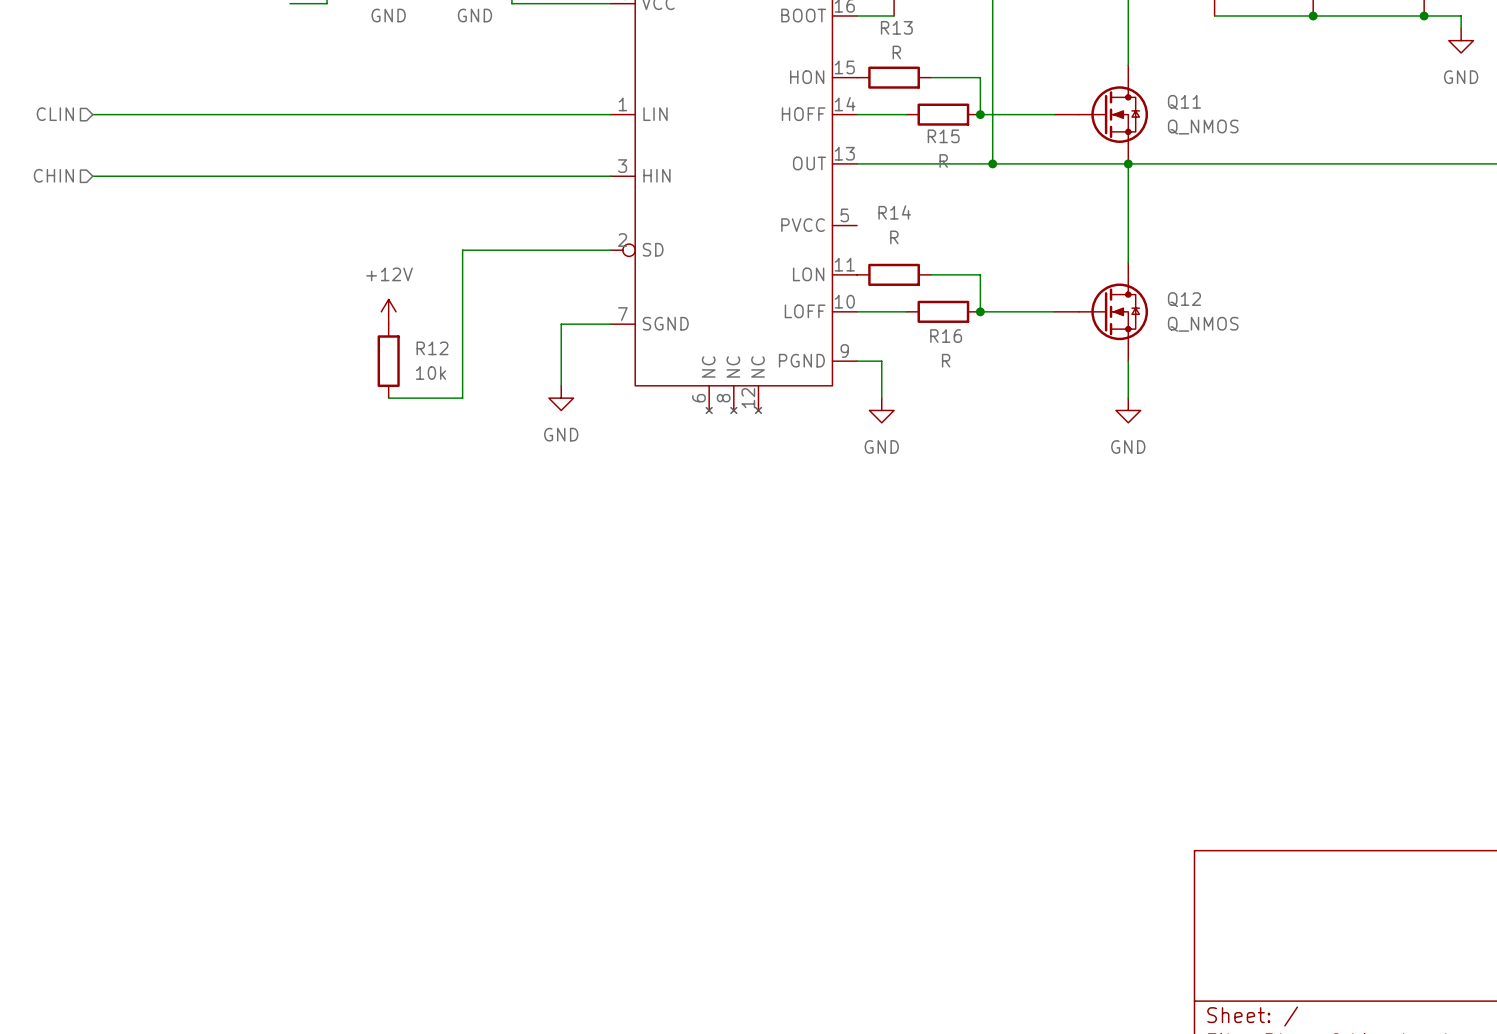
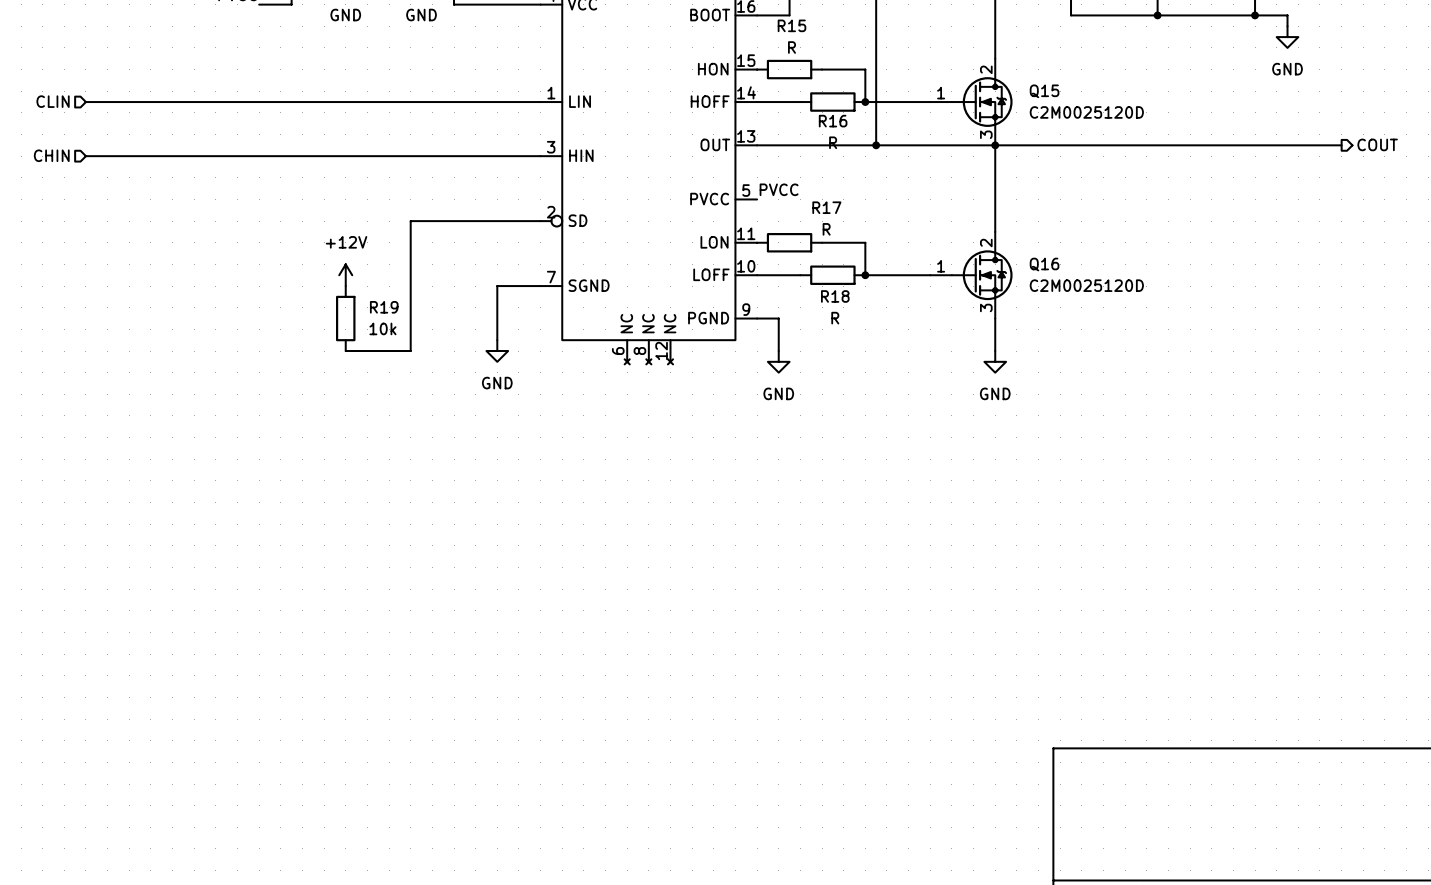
R13 name: R13 (896, 27) -> R15 (791, 25)
Q11: Q_NMOS (1101, 114) -> none
Q15: none -> C2M0025120D (971, 102)
R15 name: R15 (943, 136) -> R16 (833, 121)
R14 name: R14 (894, 212) -> R17 (826, 207)
label: none -> PVCC (779, 189)
R14 value position: R (894, 237) -> R (826, 229)
Q12: Q_NMOS (1101, 311) -> none
Q16: none -> C2M0025120D (971, 275)
R16 name: R16 (946, 336) -> R18 (835, 296)
R12 name: R12 (432, 348) -> R19 (384, 307)

